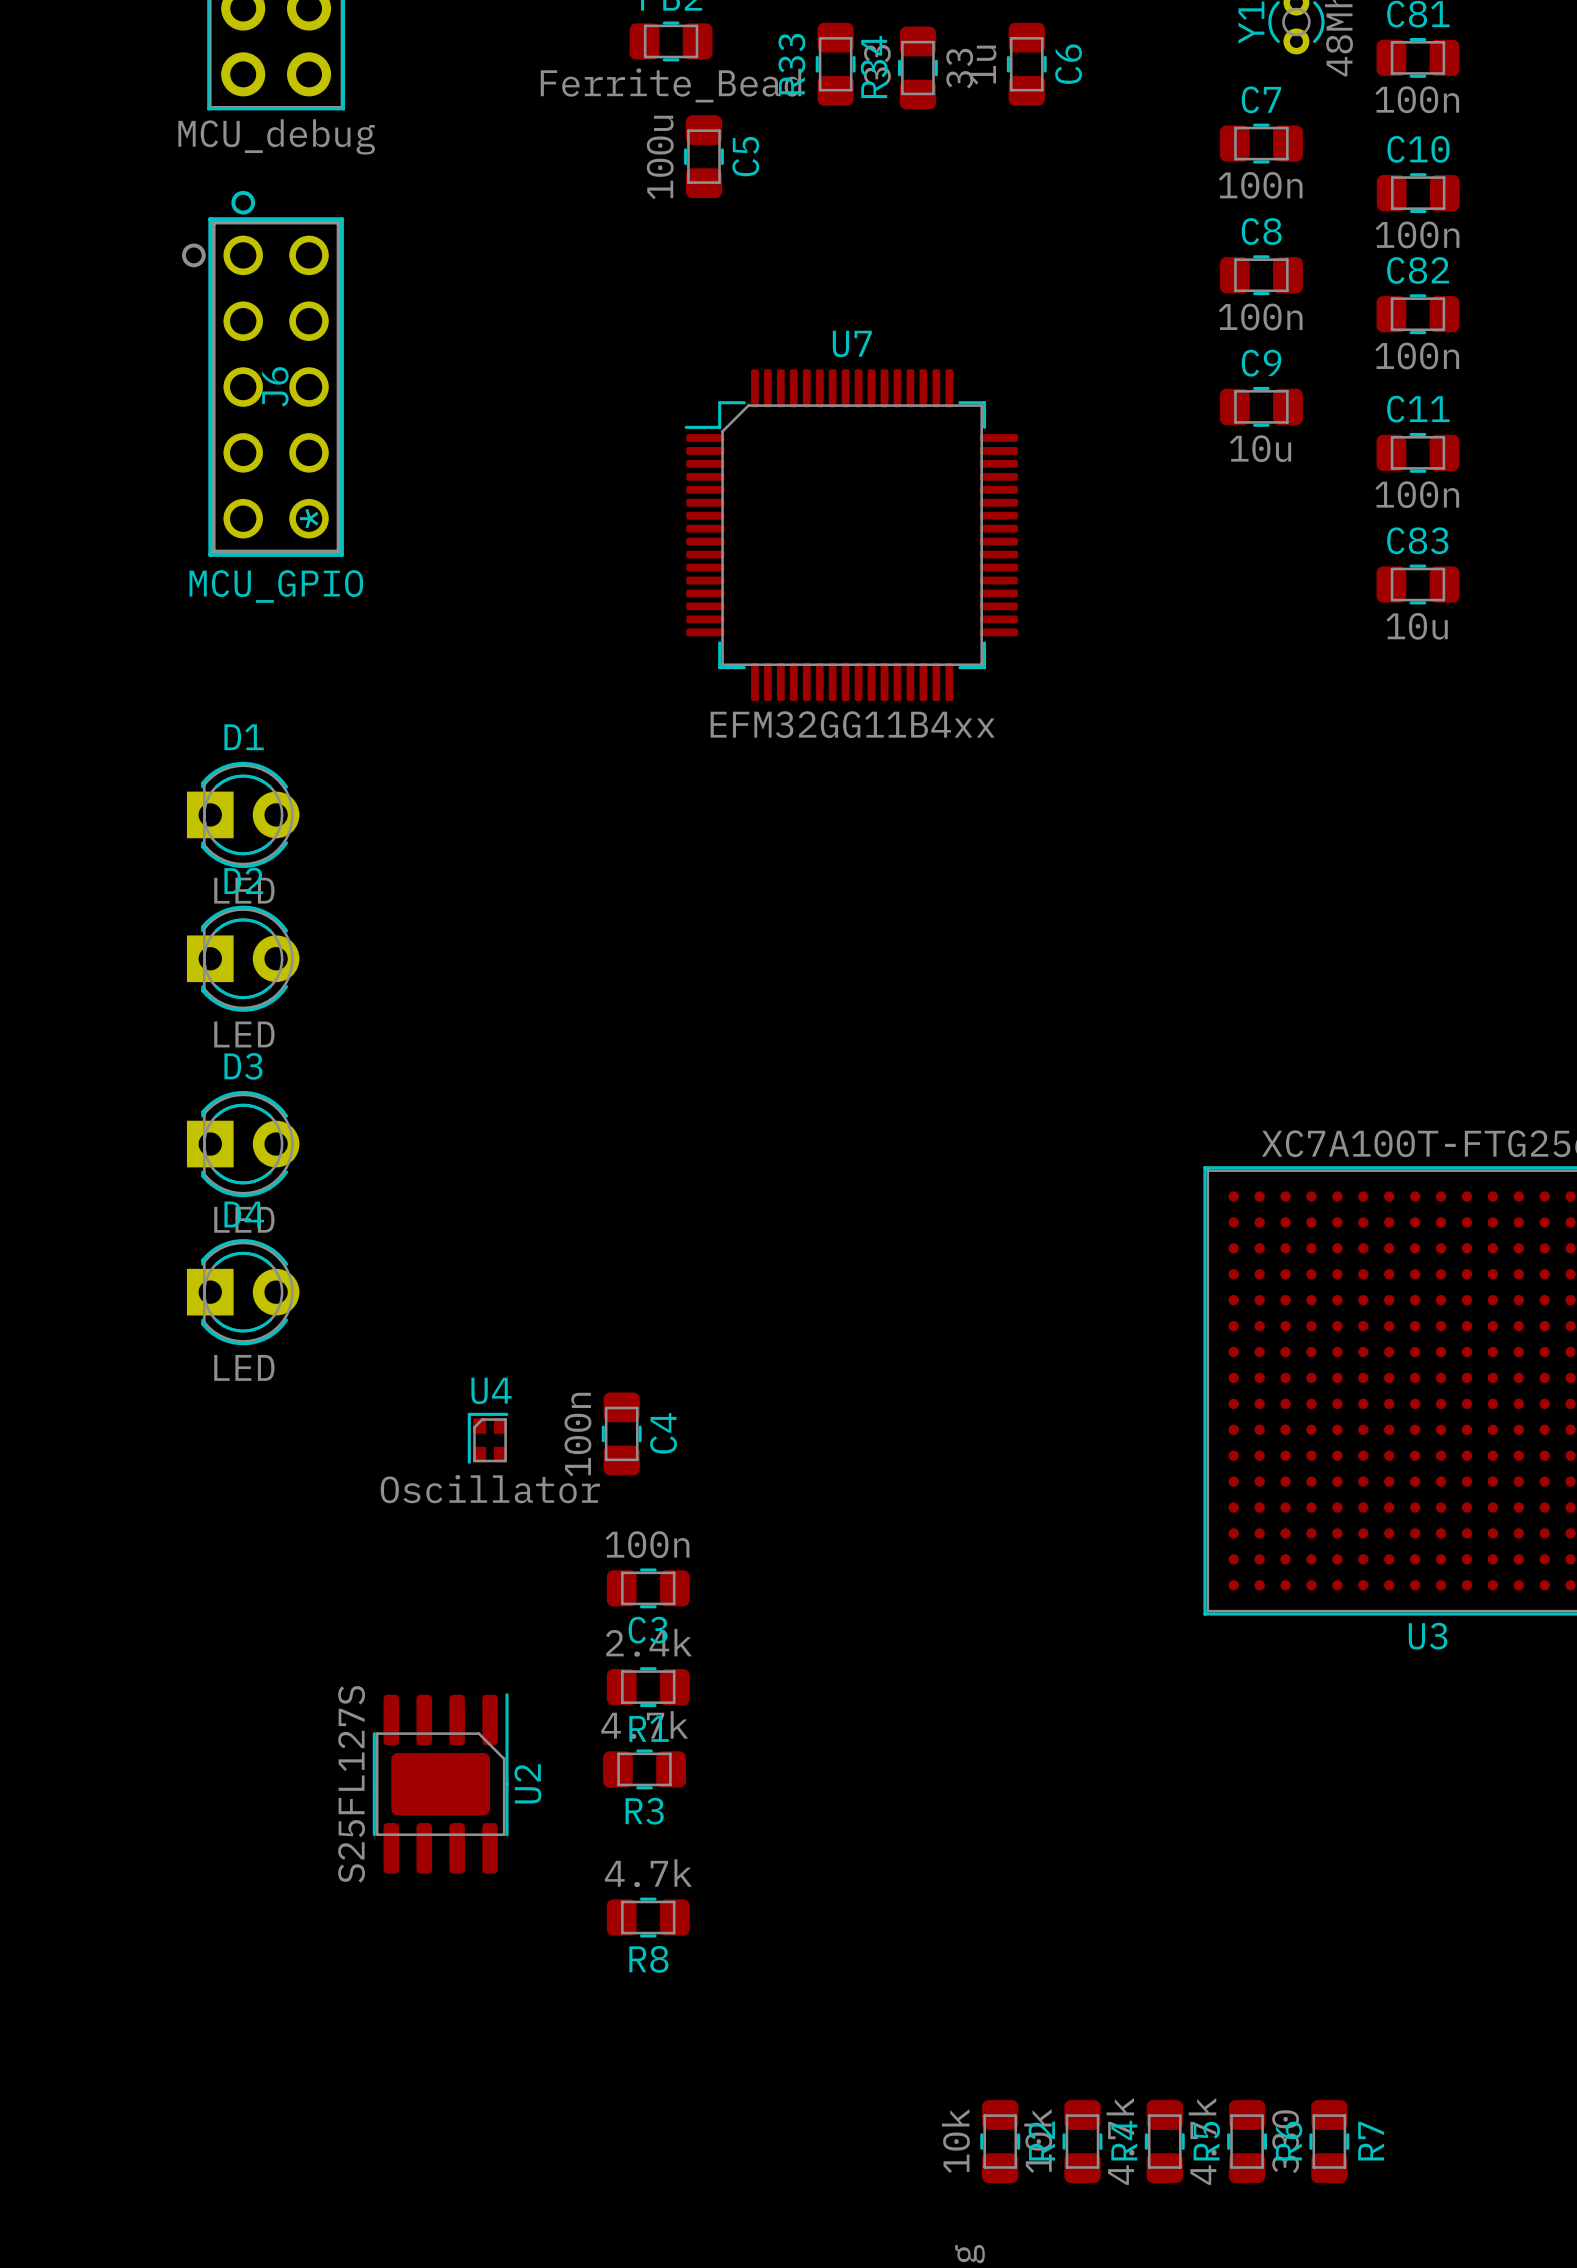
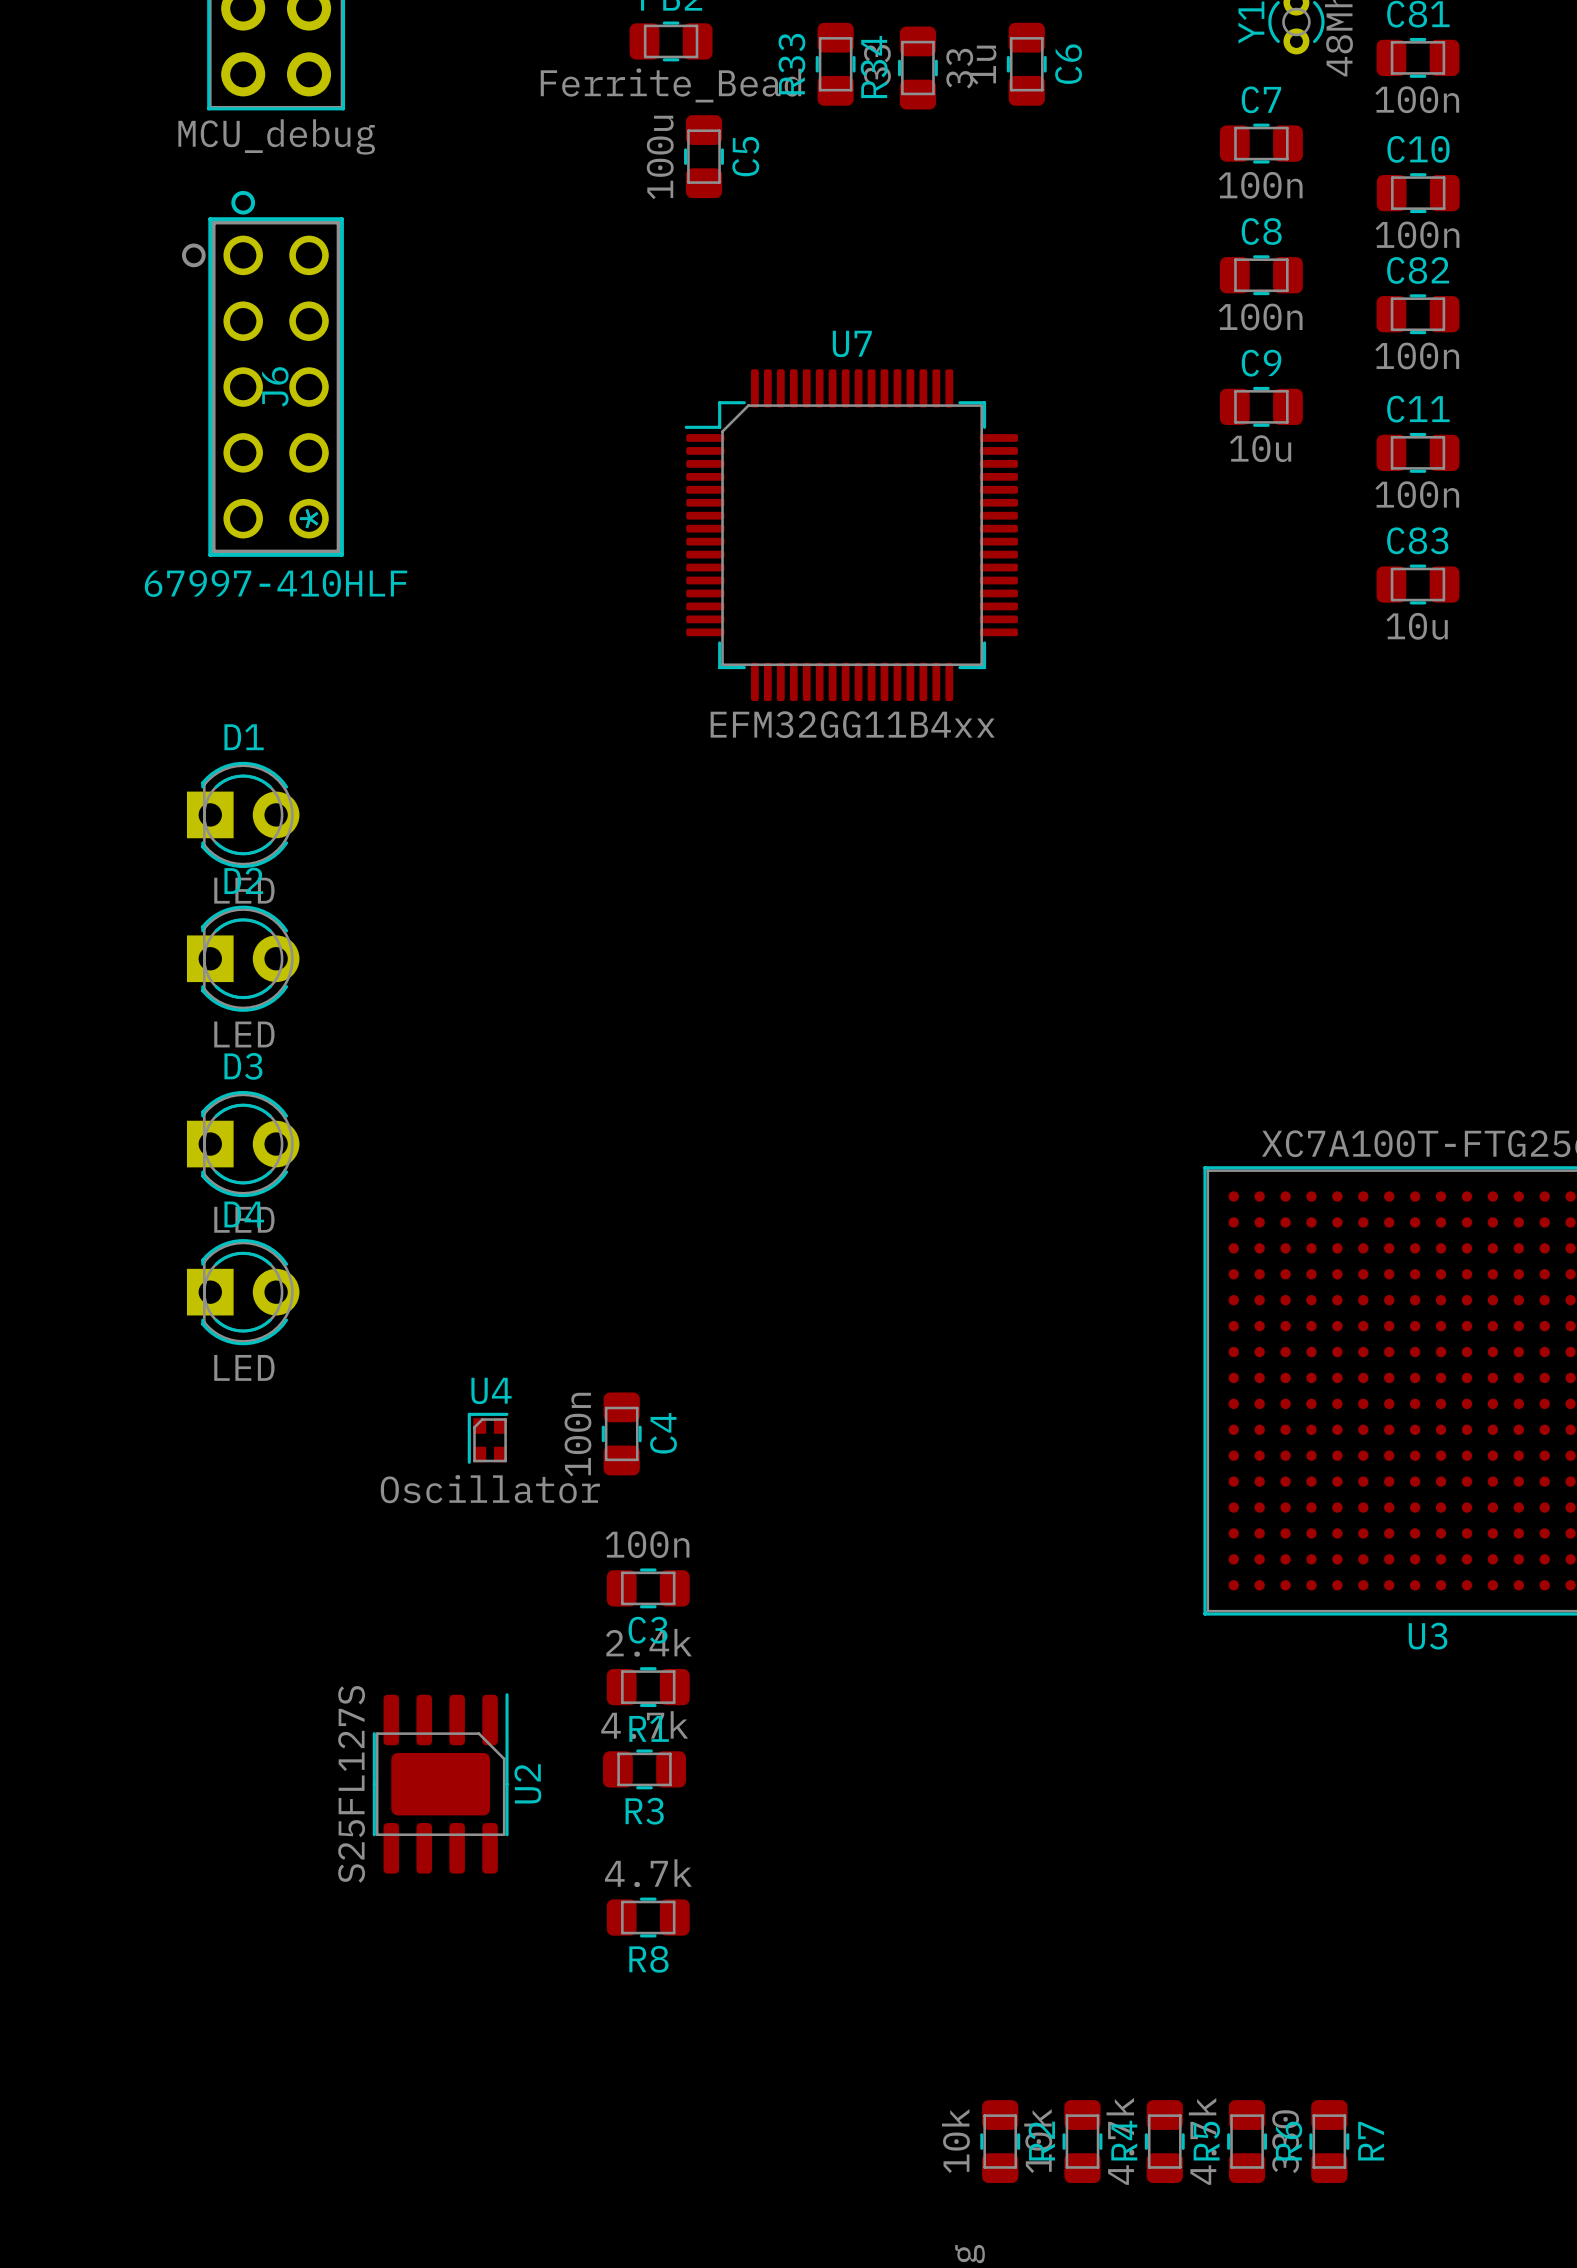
J6 value: MCU_GPIO (276, 586) -> 67997-410HLF (276, 583)

